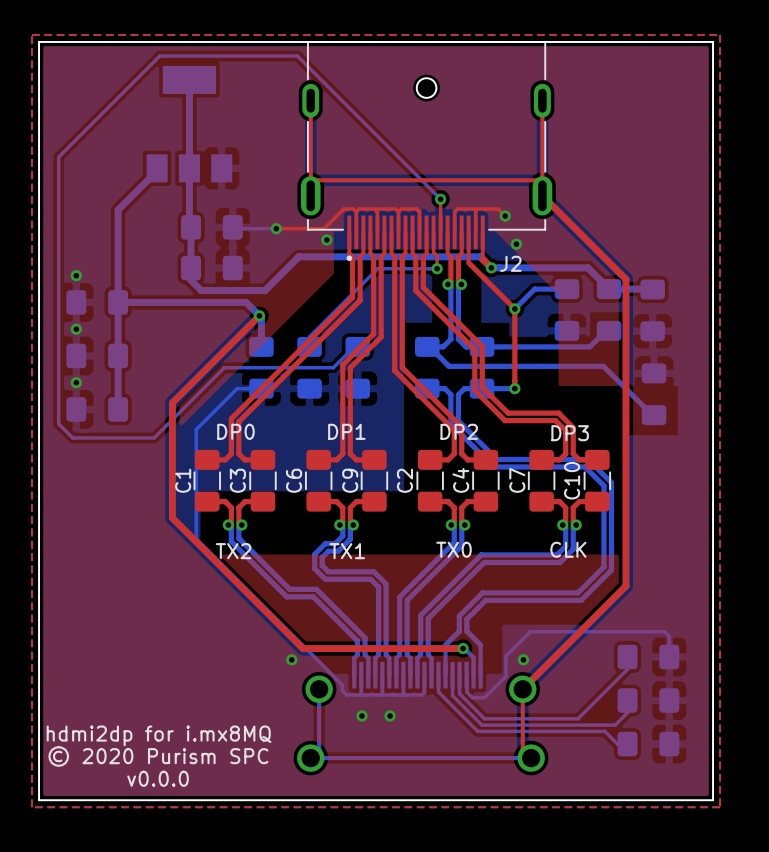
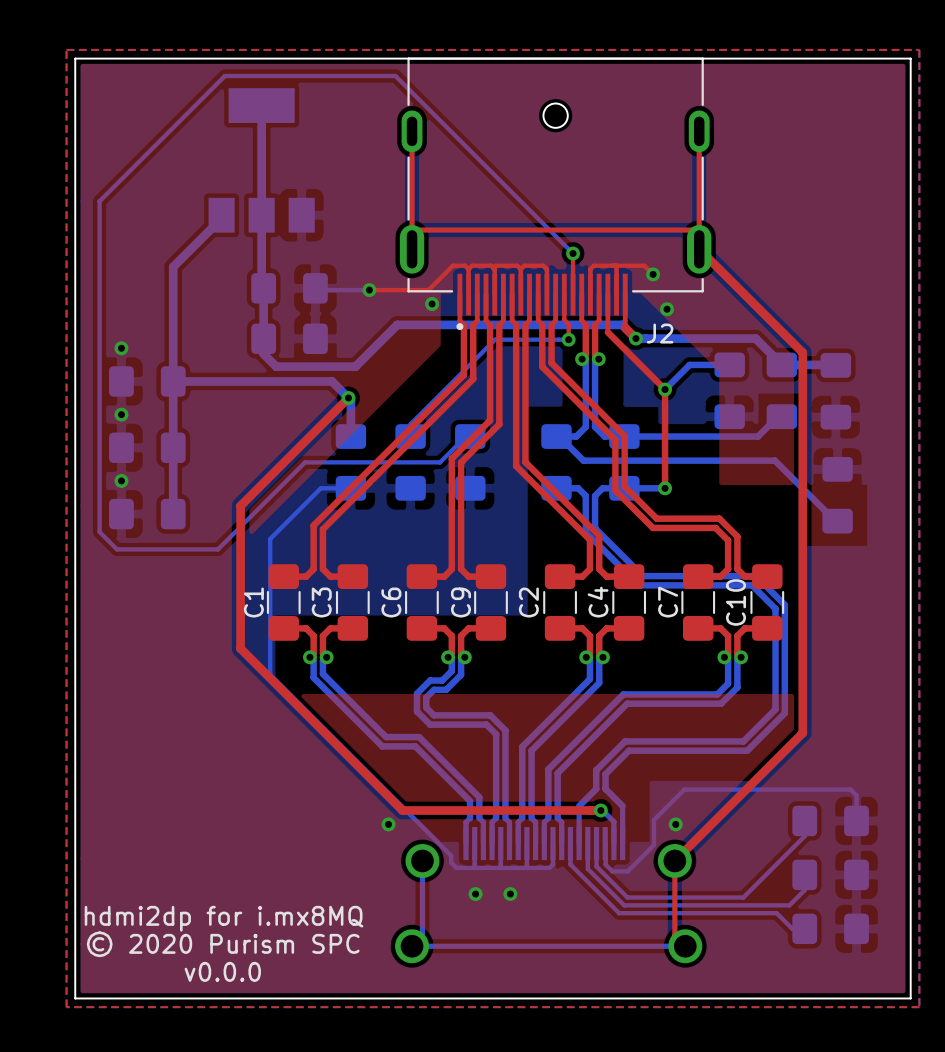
text: DP0 (235, 431) -> none
text: DP1 (346, 431) -> none
text: DP2 (459, 431) -> none
text: DP3 (570, 433) -> none
text: TX0 (453, 549) -> none
text: CLK (568, 549) -> none
text: TX2 (233, 551) -> none
text: TX1 (347, 551) -> none

